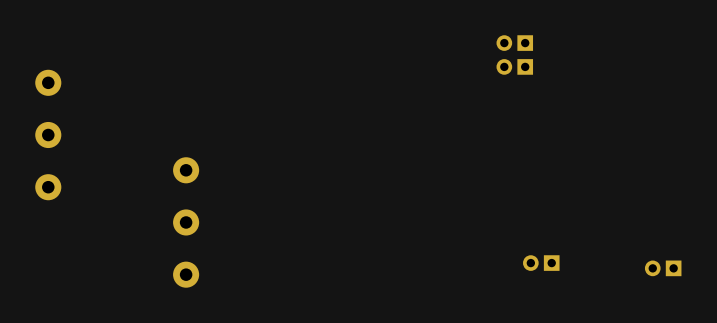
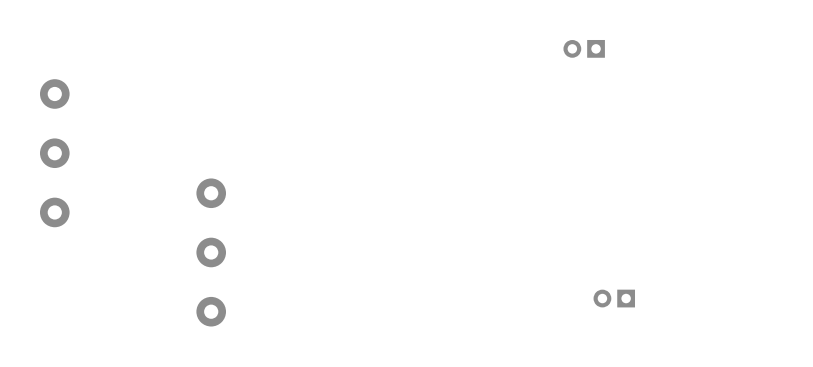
part: (514, 66) -> none
part: (663, 268) -> none

